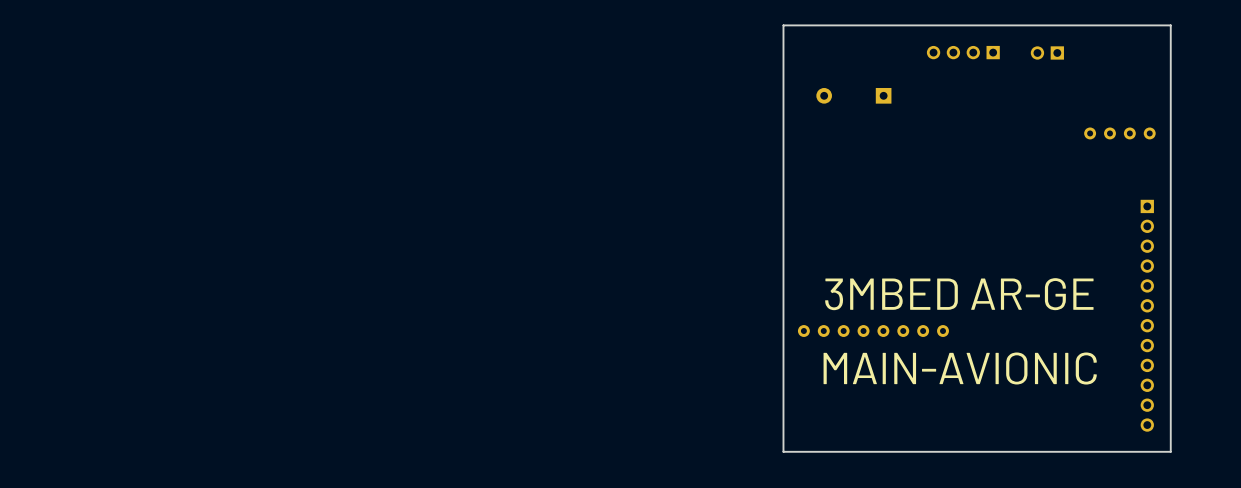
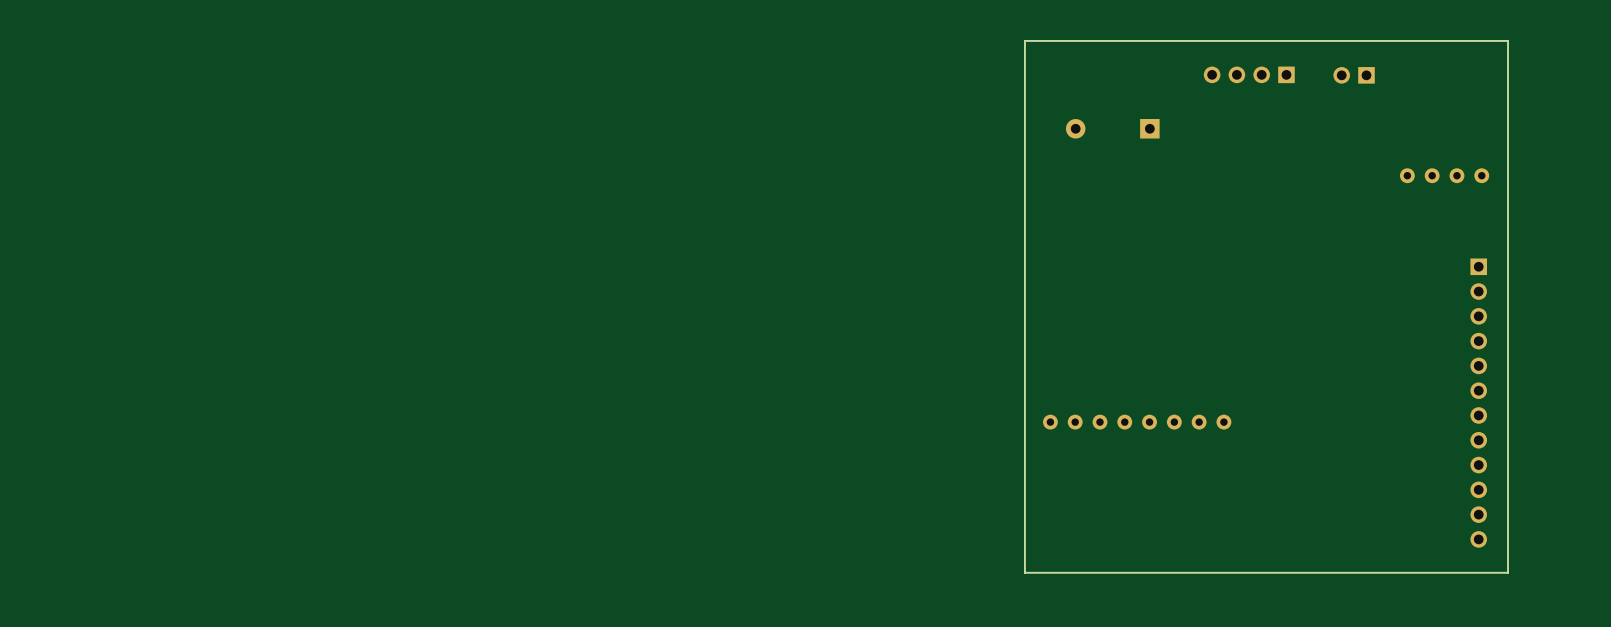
text: 3MBED AR-GE (959, 294) -> none
text: MAIN-AVIONIC (960, 368) -> none

